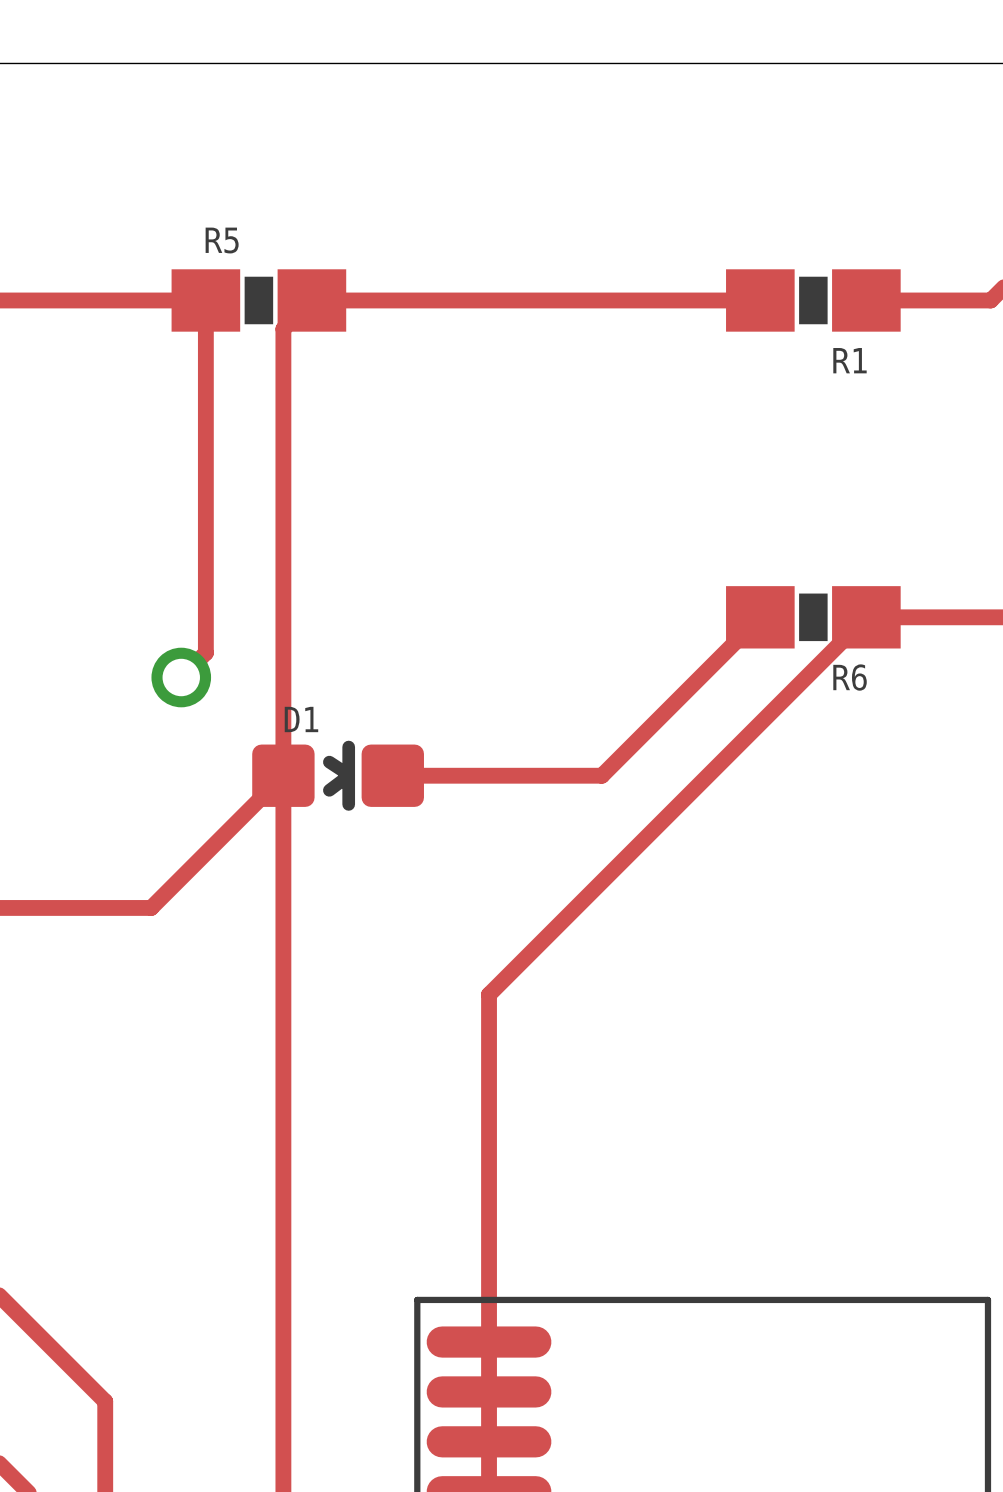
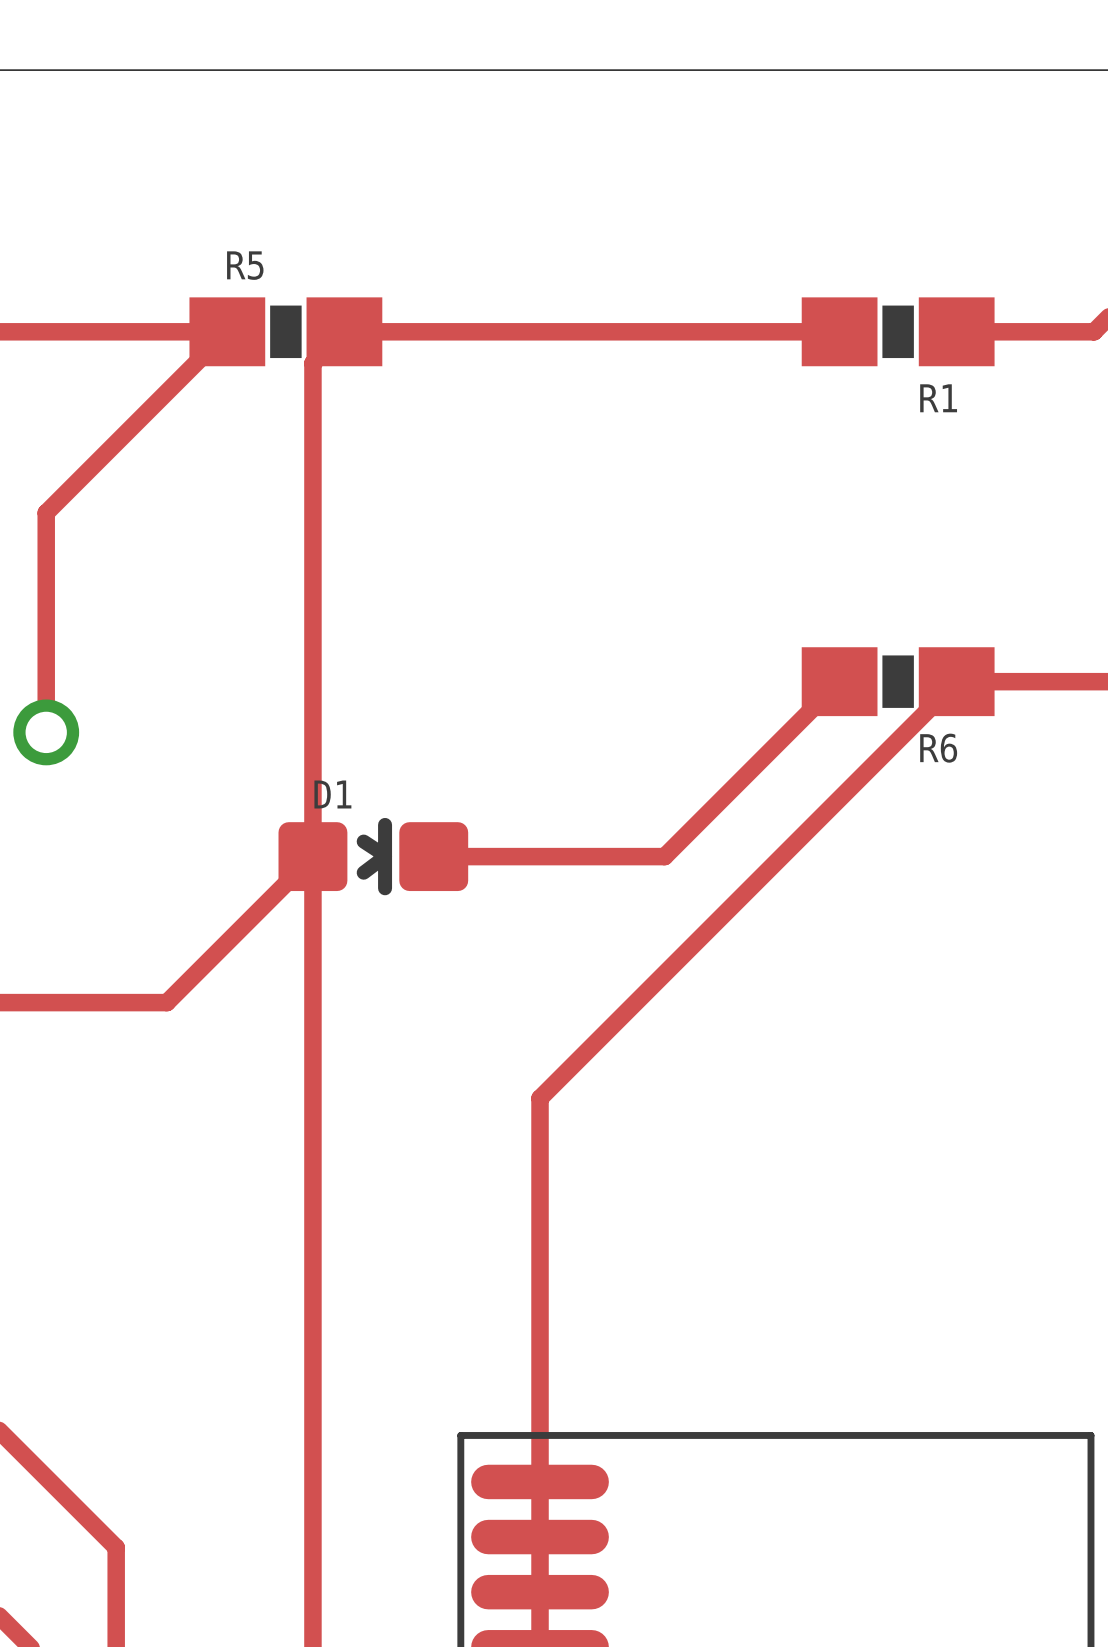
track: (205, 300) (205, 652) (181, 677) -> (227, 331) (46, 512) (46, 732)
via position: (181, 677) -> (46, 732)

